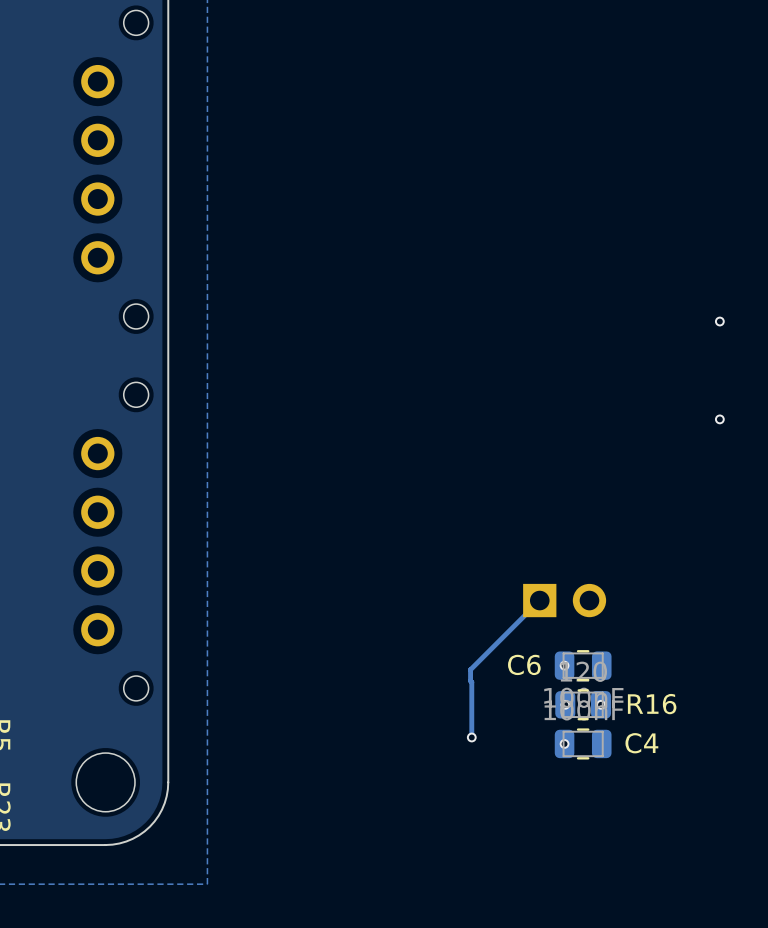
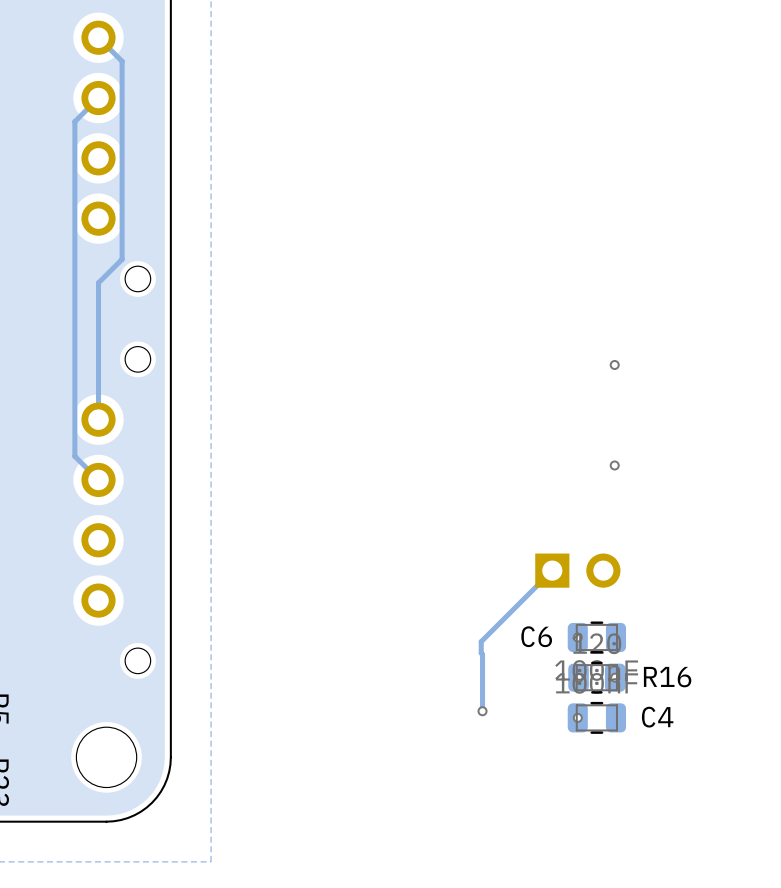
track: none -> (98, 37) (122, 61) (122, 259) (98, 282) (98, 419)
track: none -> (98, 98) (74, 121) (74, 456) (98, 479)
via: (719, 321) -> none
via: none -> (614, 364)
via: (719, 419) -> none
via: none -> (614, 465)

